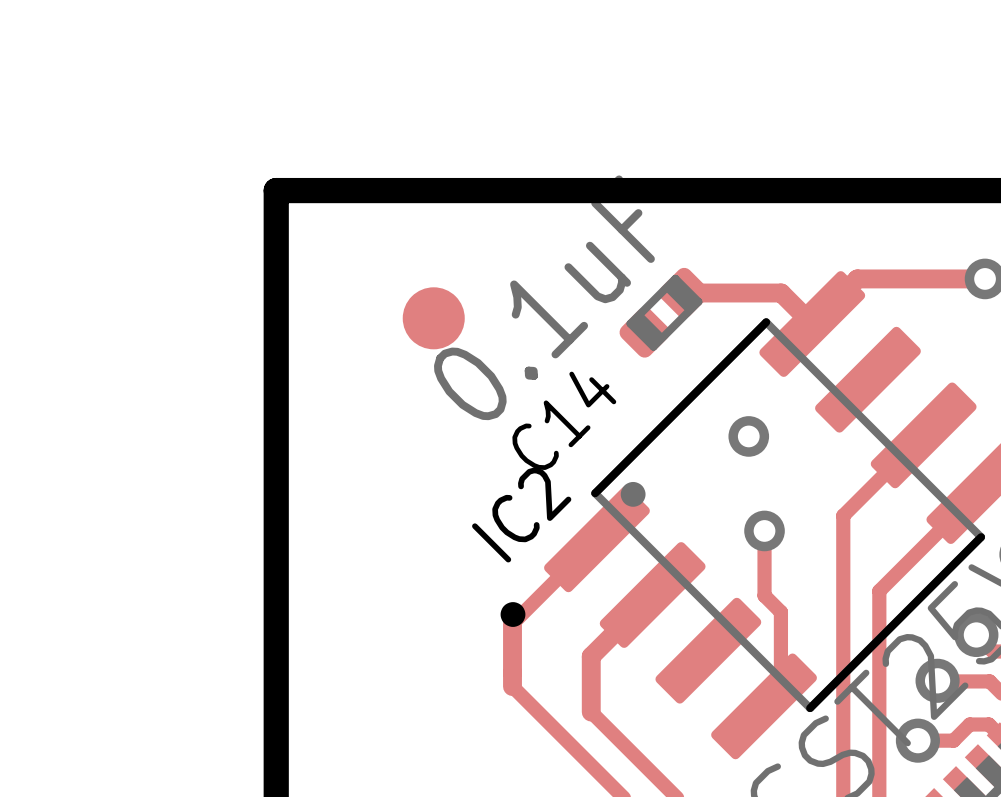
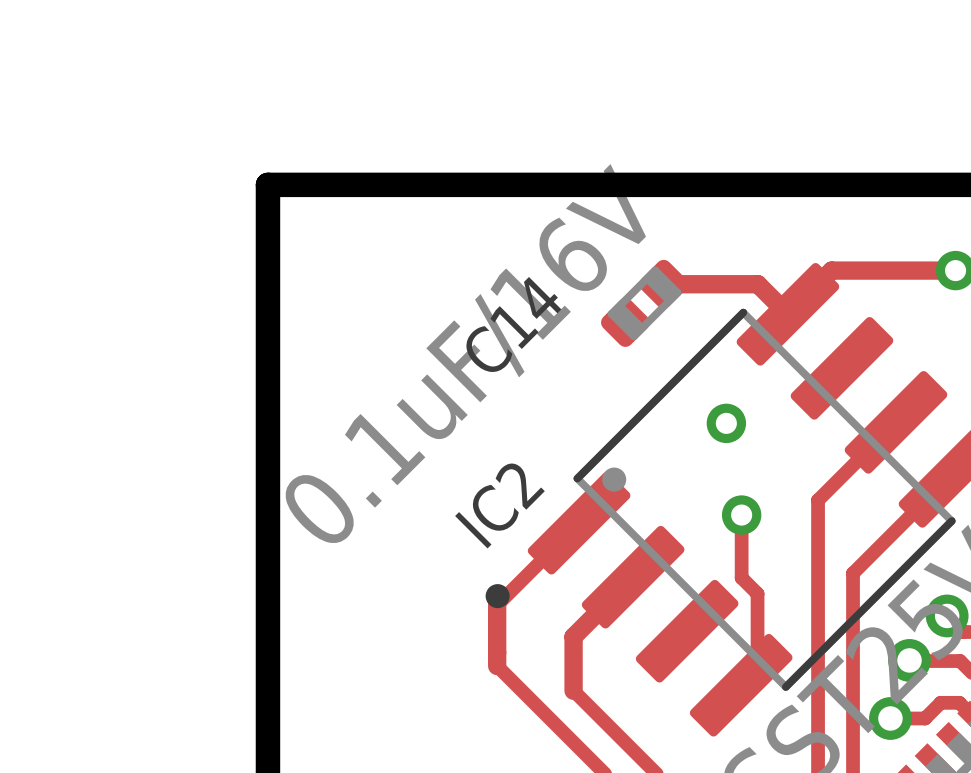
C14 value: 0.1uF (544, 297) -> 0.1uF/16V (464, 354)
part: (433, 318) -> none
C14 name position: C14 (564, 420) -> C14 (513, 324)

